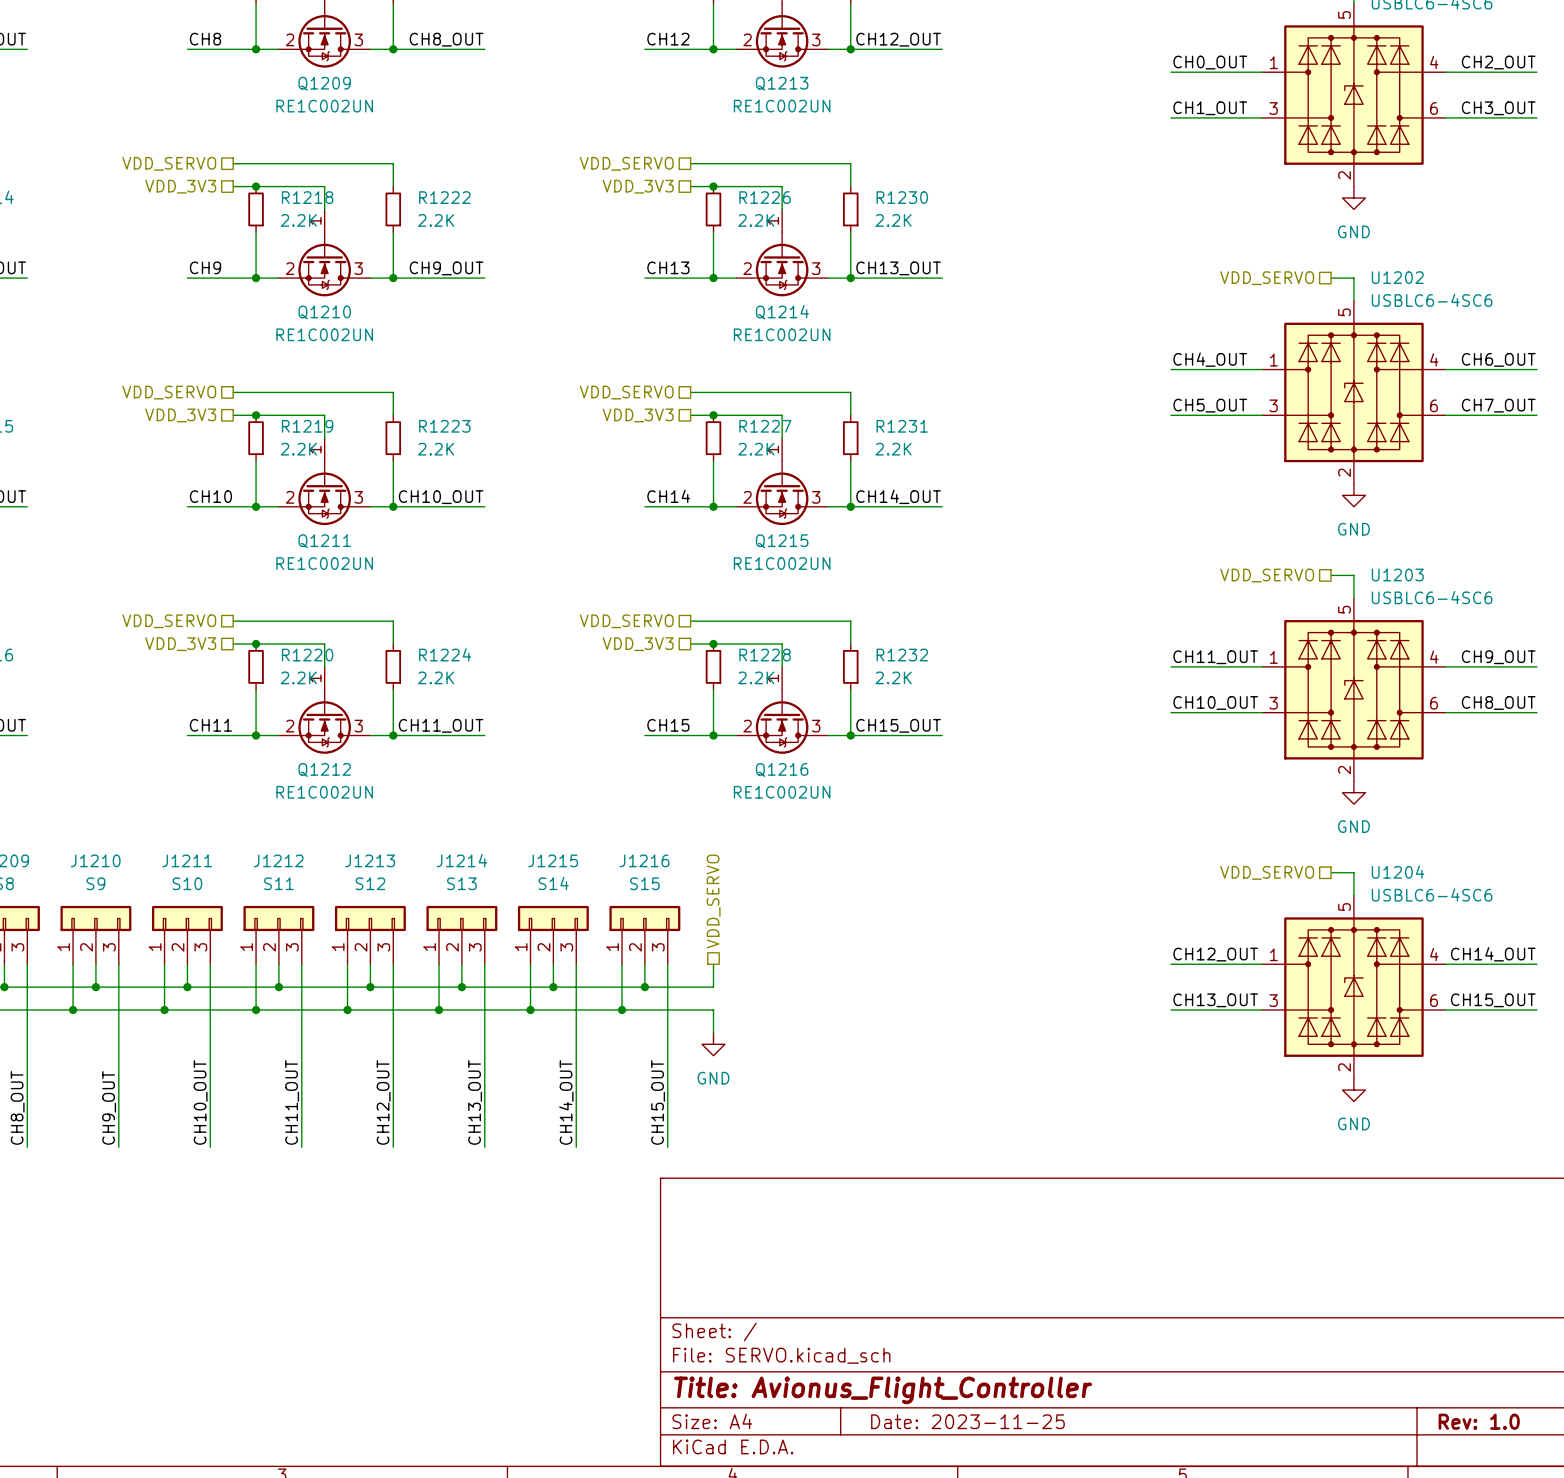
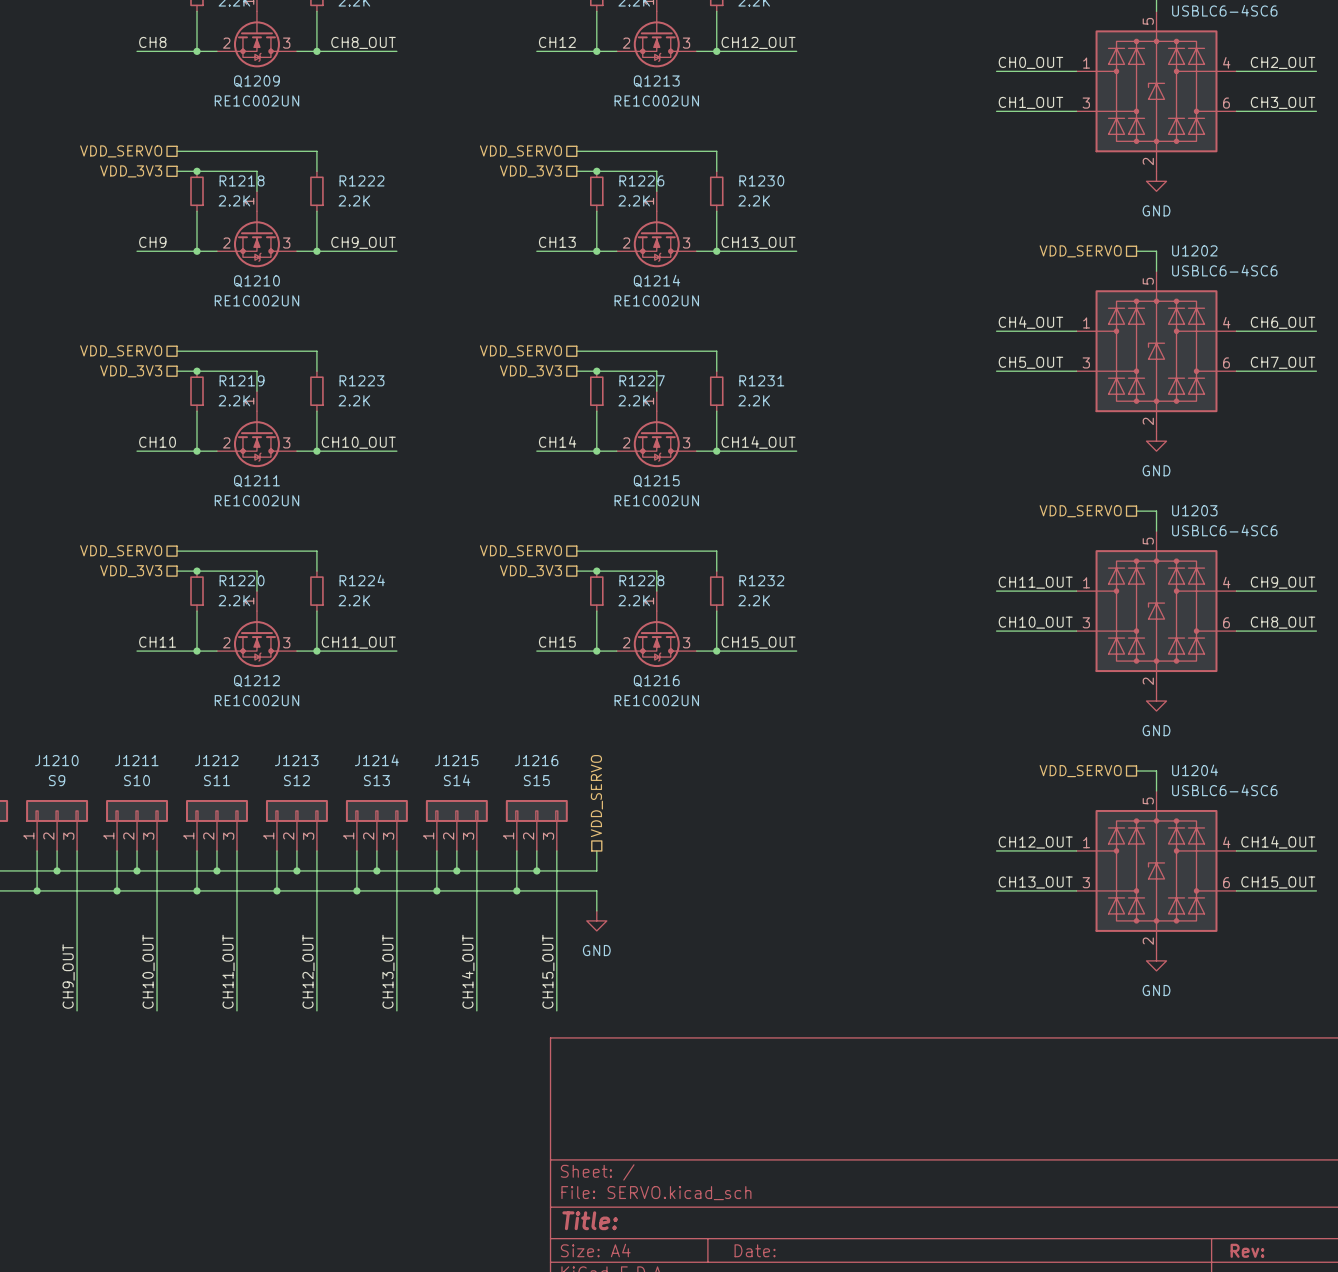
title block: Title: Avionus_Flight_Controller (883, 1390) -> Title: (590, 1220)
title block: Date: 2023-11-25 (967, 1421) -> Date: (755, 1250)
title block: Rev: 1.0 (1479, 1421) -> Rev: (1247, 1250)

